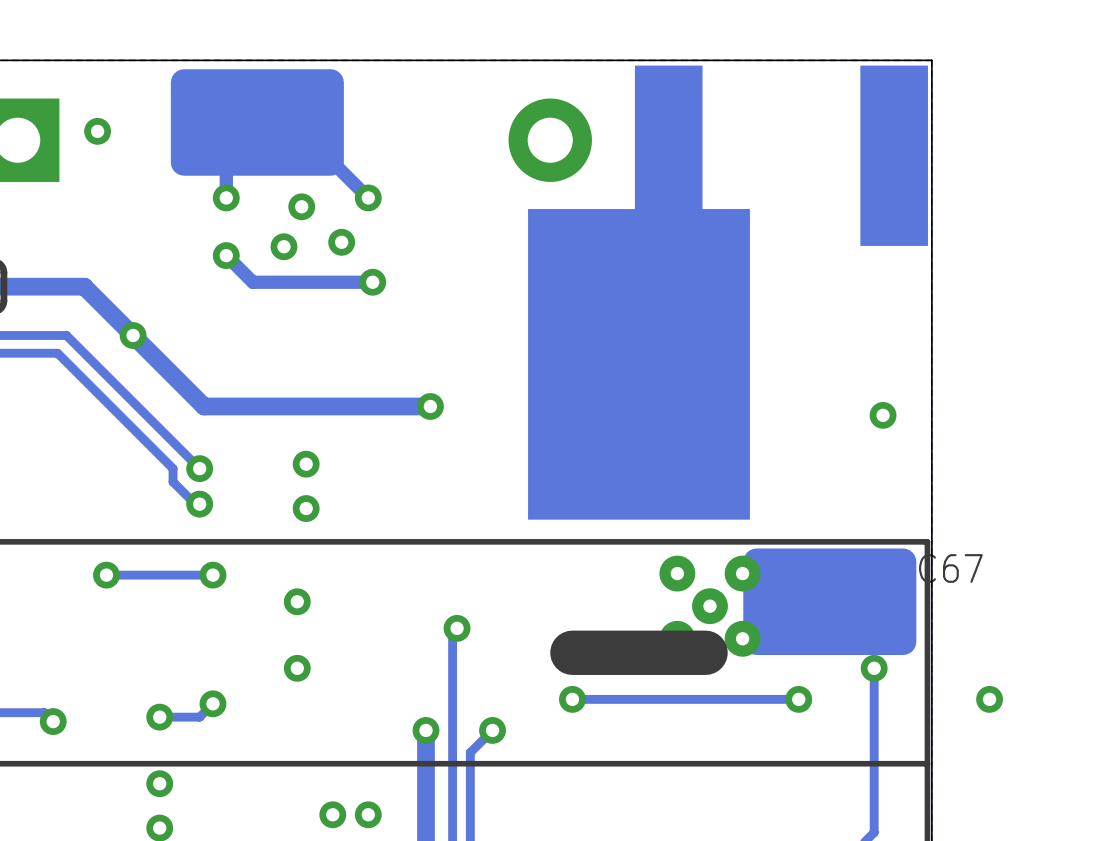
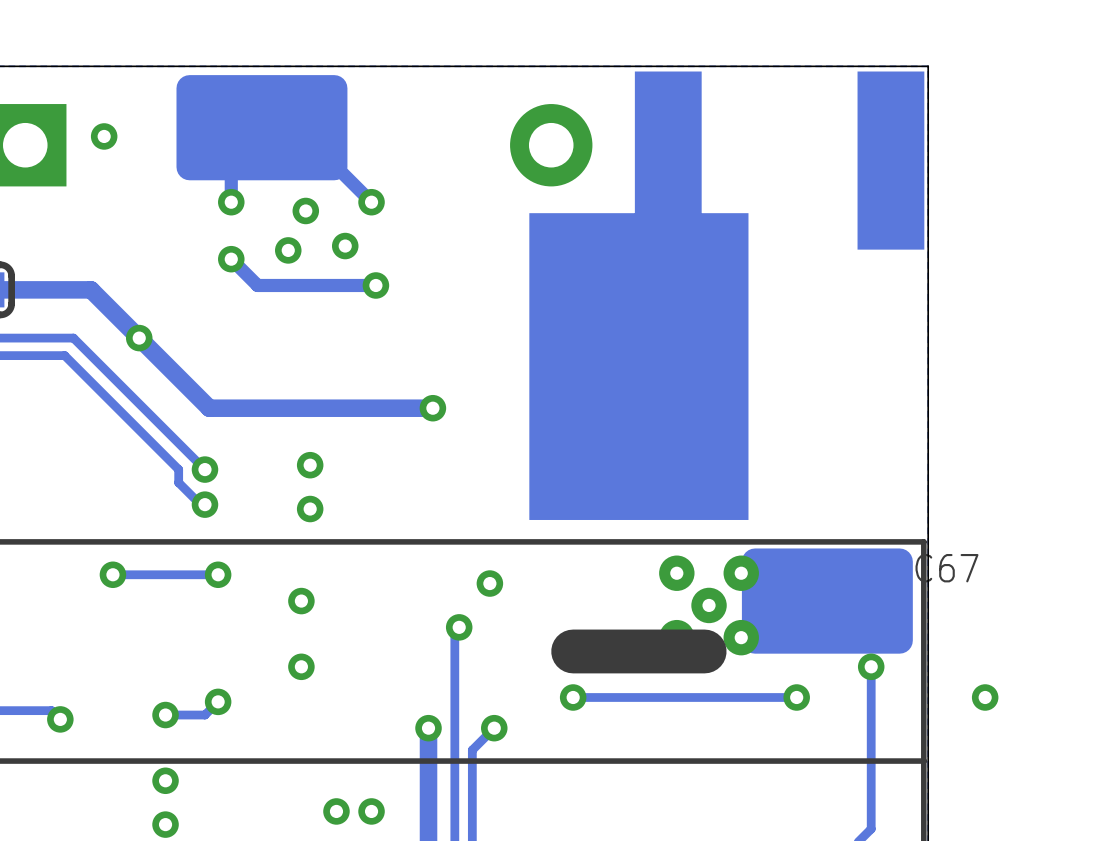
via: (883, 415) -> none
via: none -> (489, 583)

